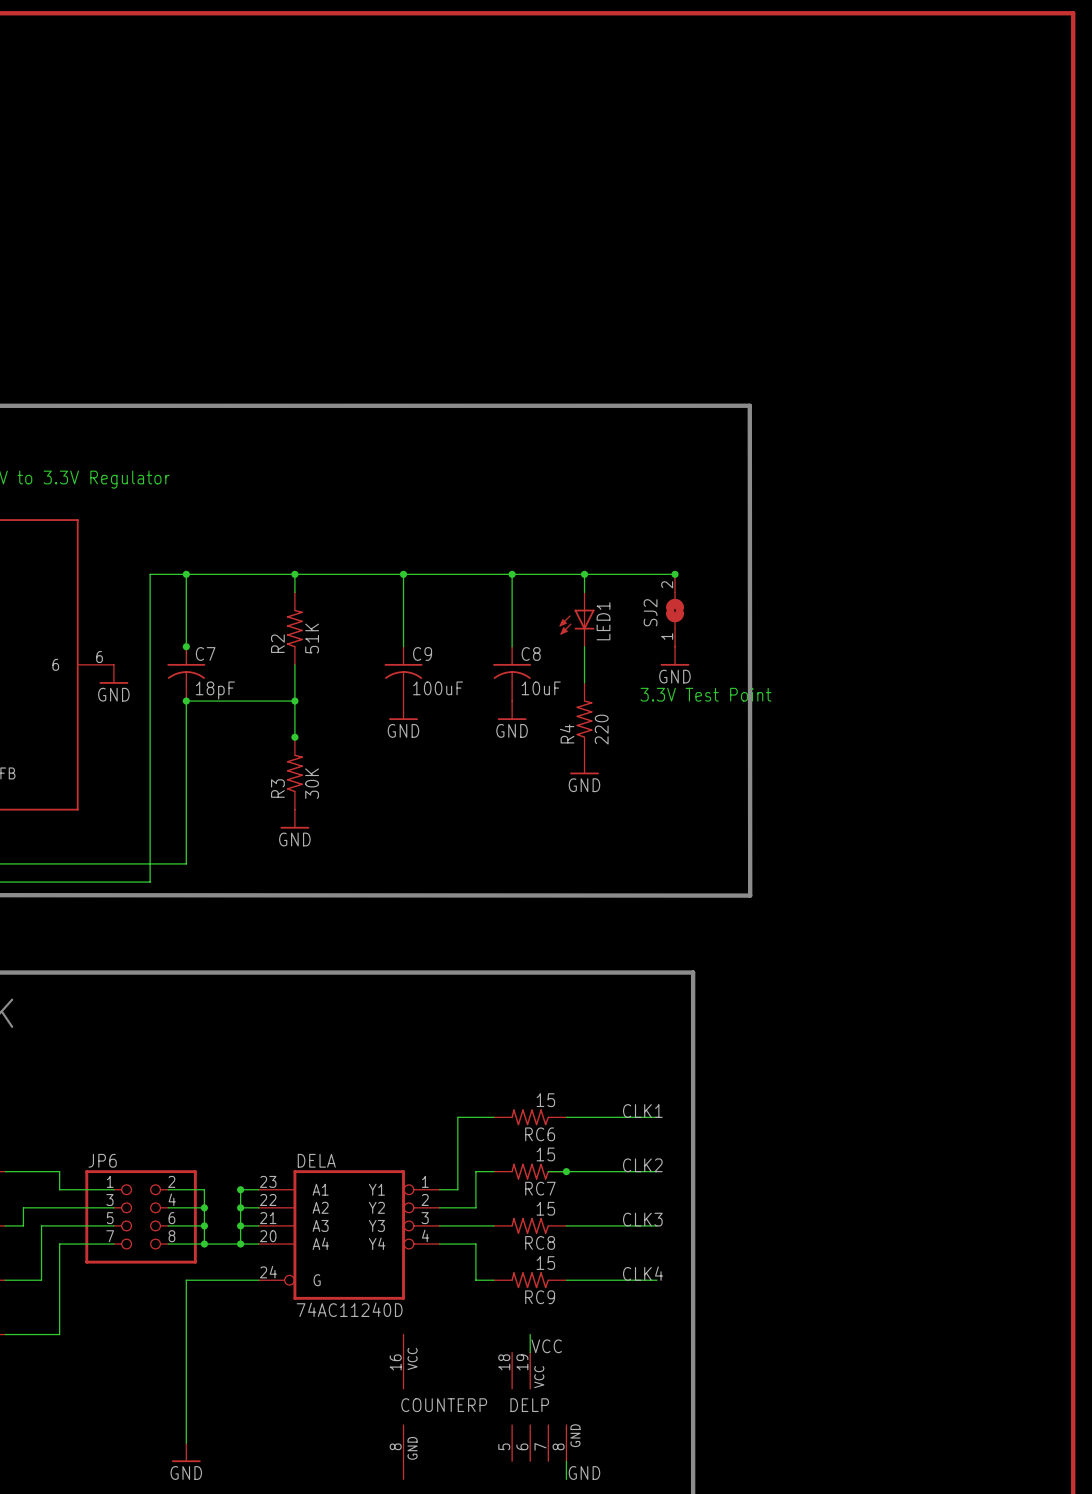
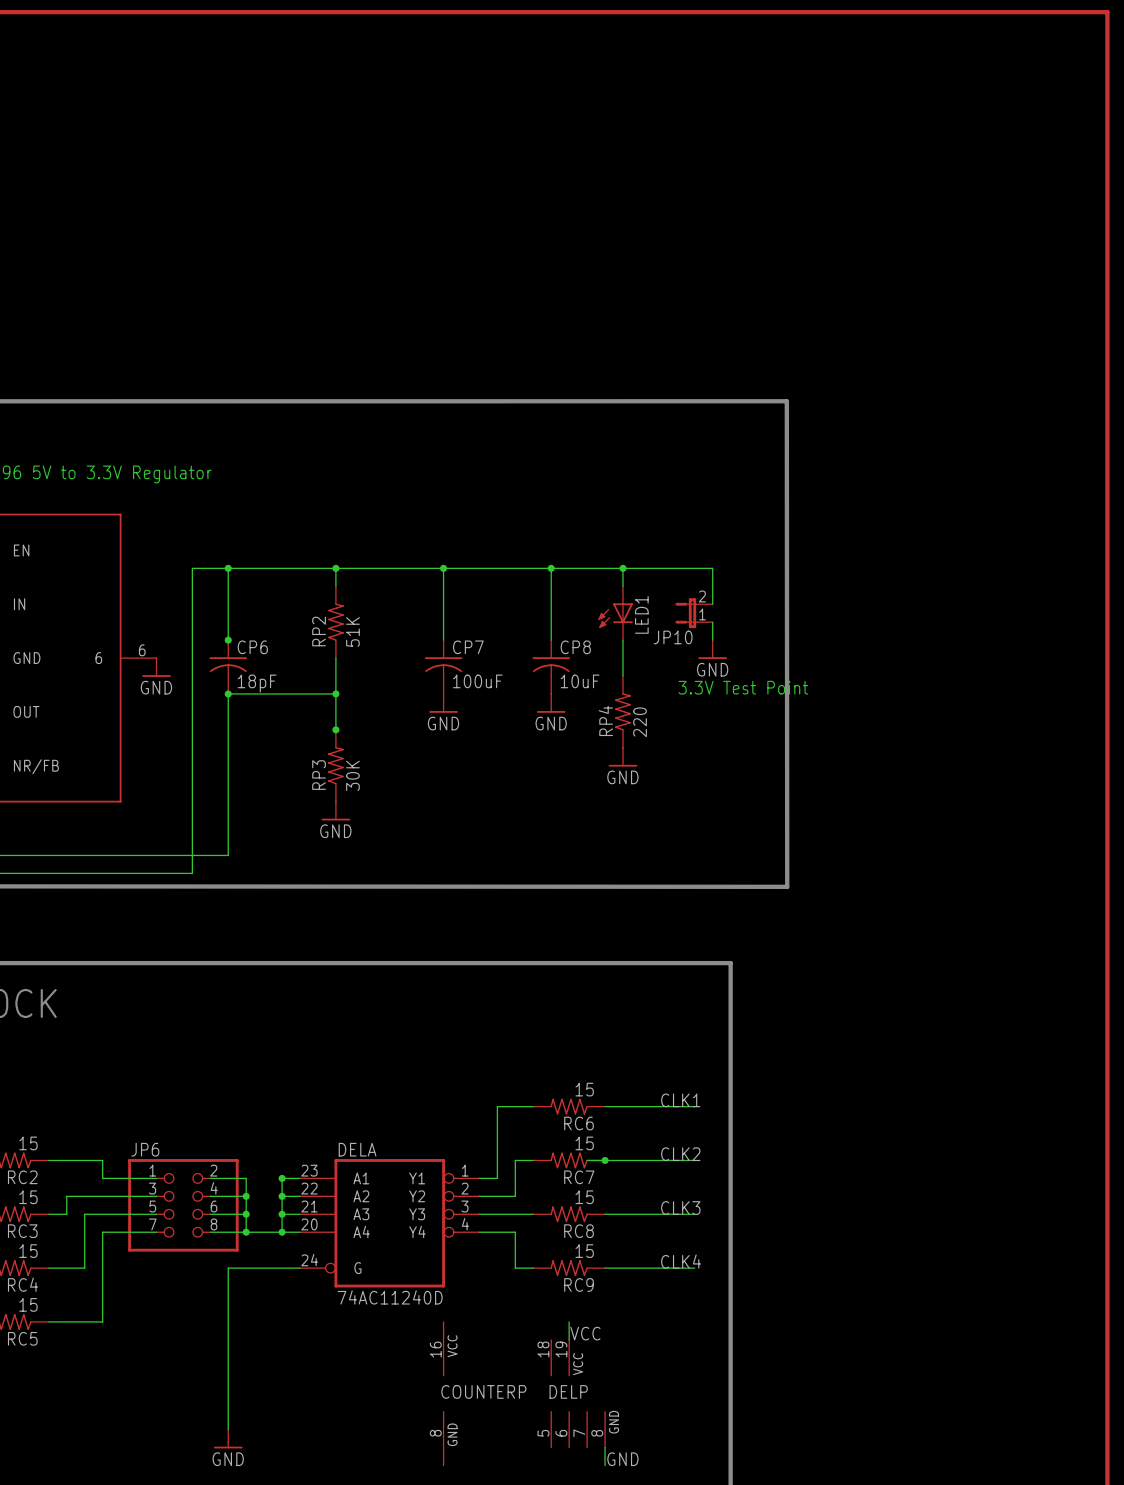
junction: (675, 574) -> none
SJ2: (675, 610) -> none
JP10: none -> (694, 613)
R2 name: R2 (277, 643) -> RP2 (319, 631)
C7 name: C7 (205, 653) -> CP6 (252, 647)
C9 name: C9 (422, 653) -> CP7 (468, 647)
C8 name: C8 (531, 653) -> CP8 (575, 647)
R4 name: R4 (567, 733) -> RP4 (605, 720)
R3 name: R3 (277, 788) -> RP3 (319, 775)

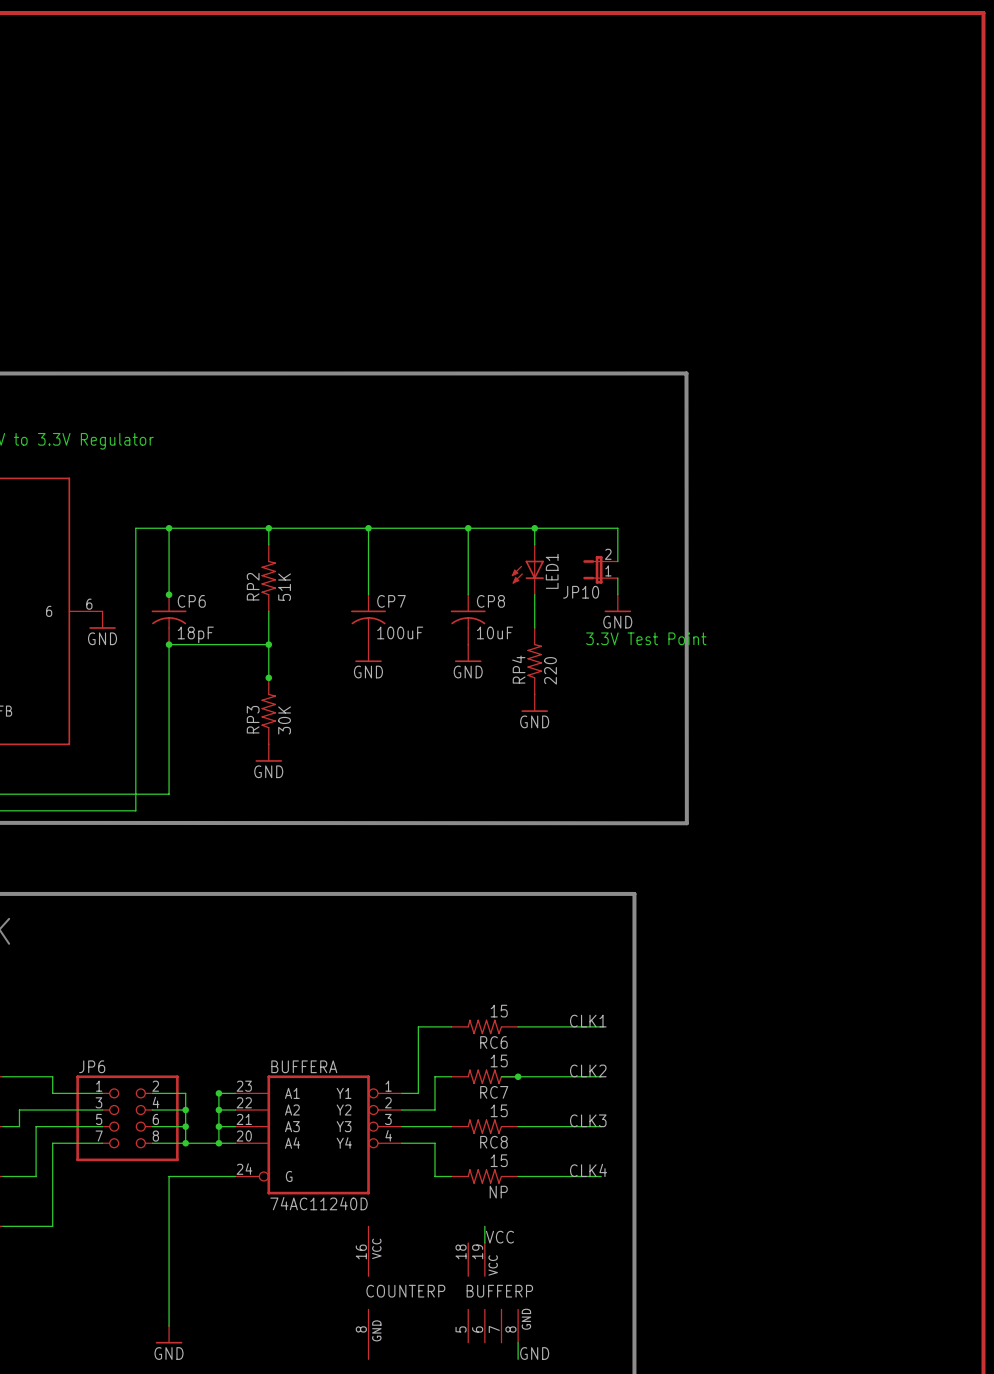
DELA name: DELA (357, 1149) -> BUFFERA (304, 1066)
RC9 name: RC9 (578, 1284) -> NP (498, 1192)
DELP name: DELP (568, 1391) -> BUFFERP (499, 1291)

